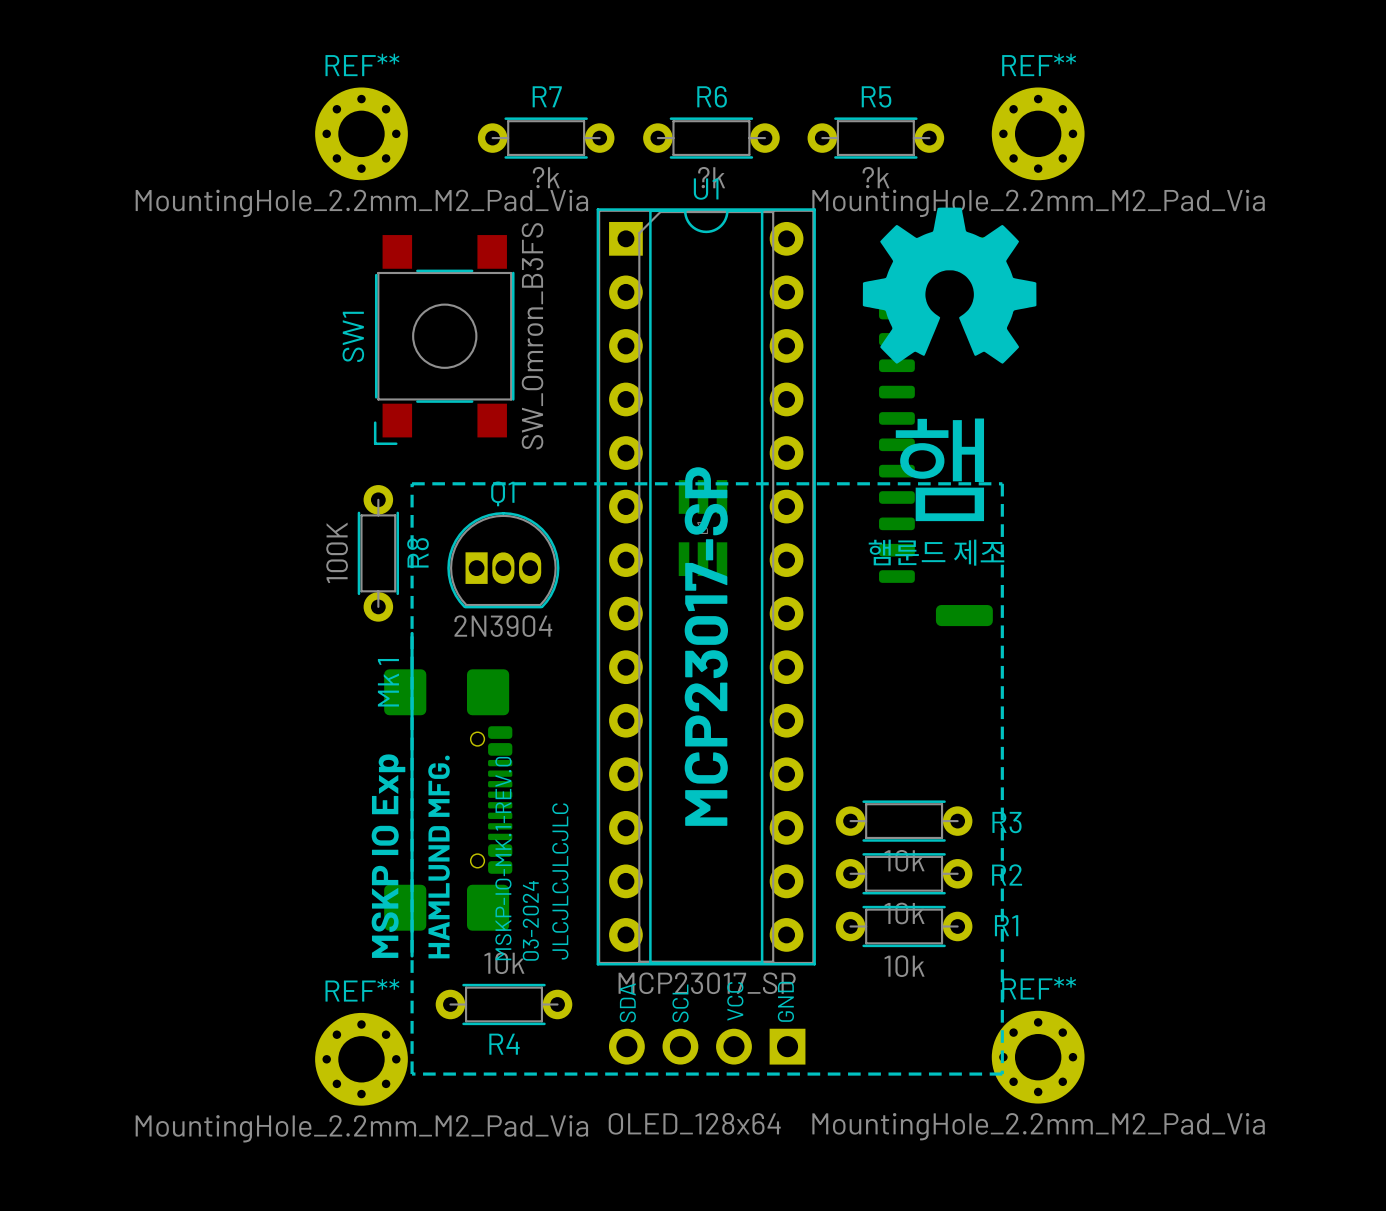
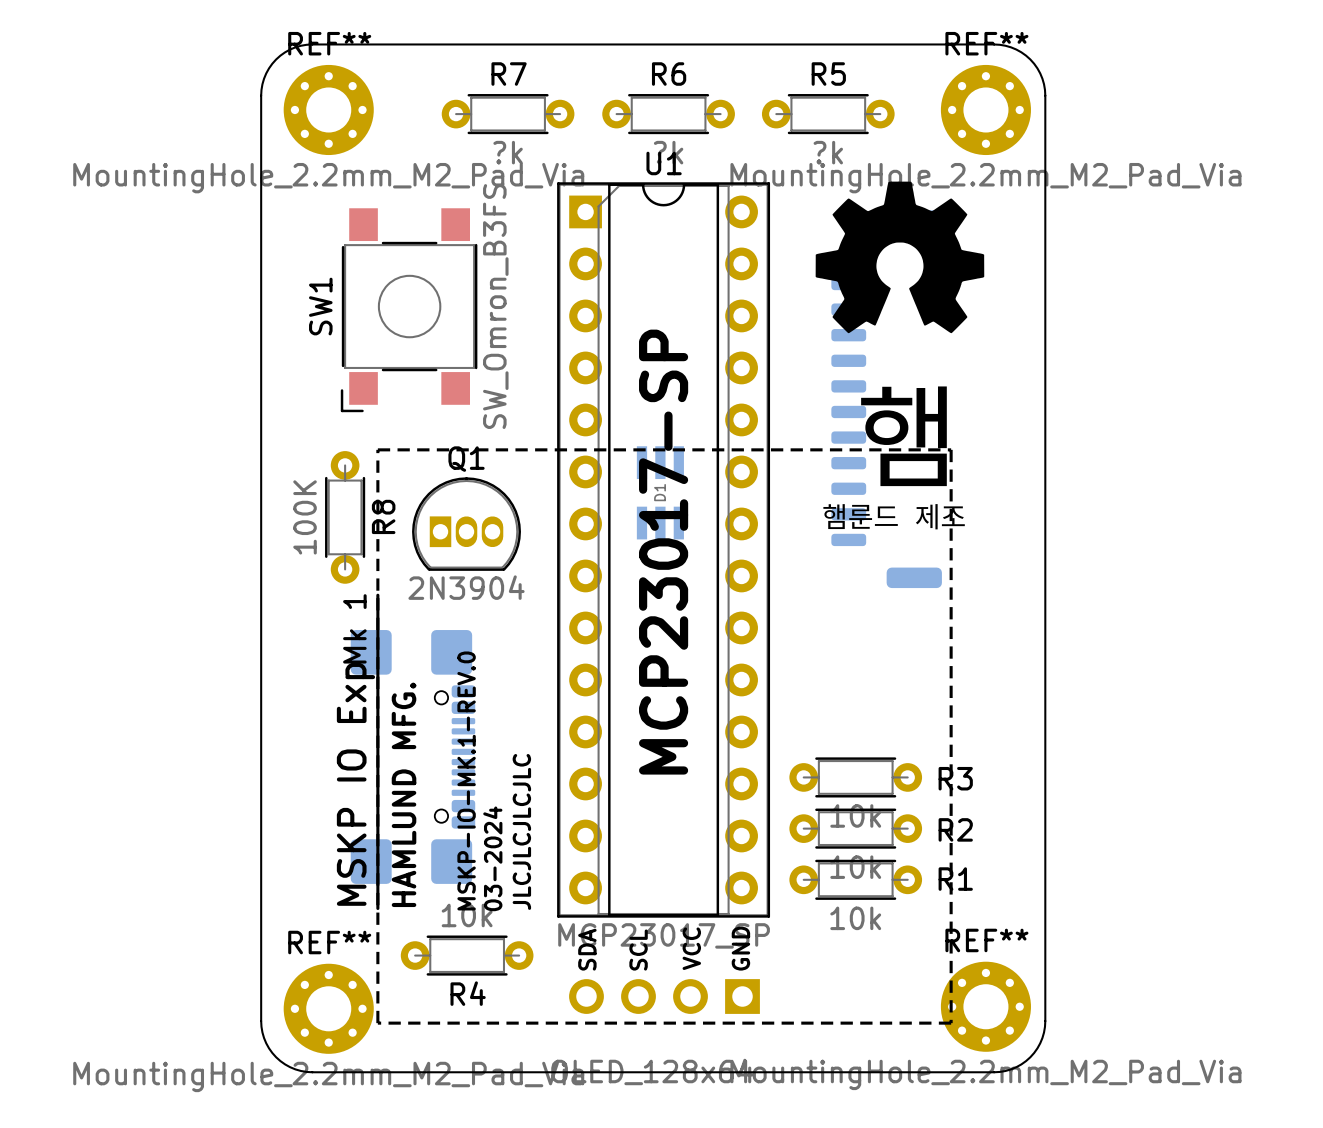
board edge: none -> (312, 44) (994, 44) (1005, 45) (1021, 52) (1037, 68) (1042, 78) (1045, 95) (1045, 1021) (1040, 1043) (1030, 1057) (1021, 1064) (1005, 1070) (994, 1072) (312, 1072) (300, 1070) (285, 1064) (269, 1048) (264, 1037) (261, 1021) (261, 95) (264, 78) (276, 59) (290, 49) (312, 44)

